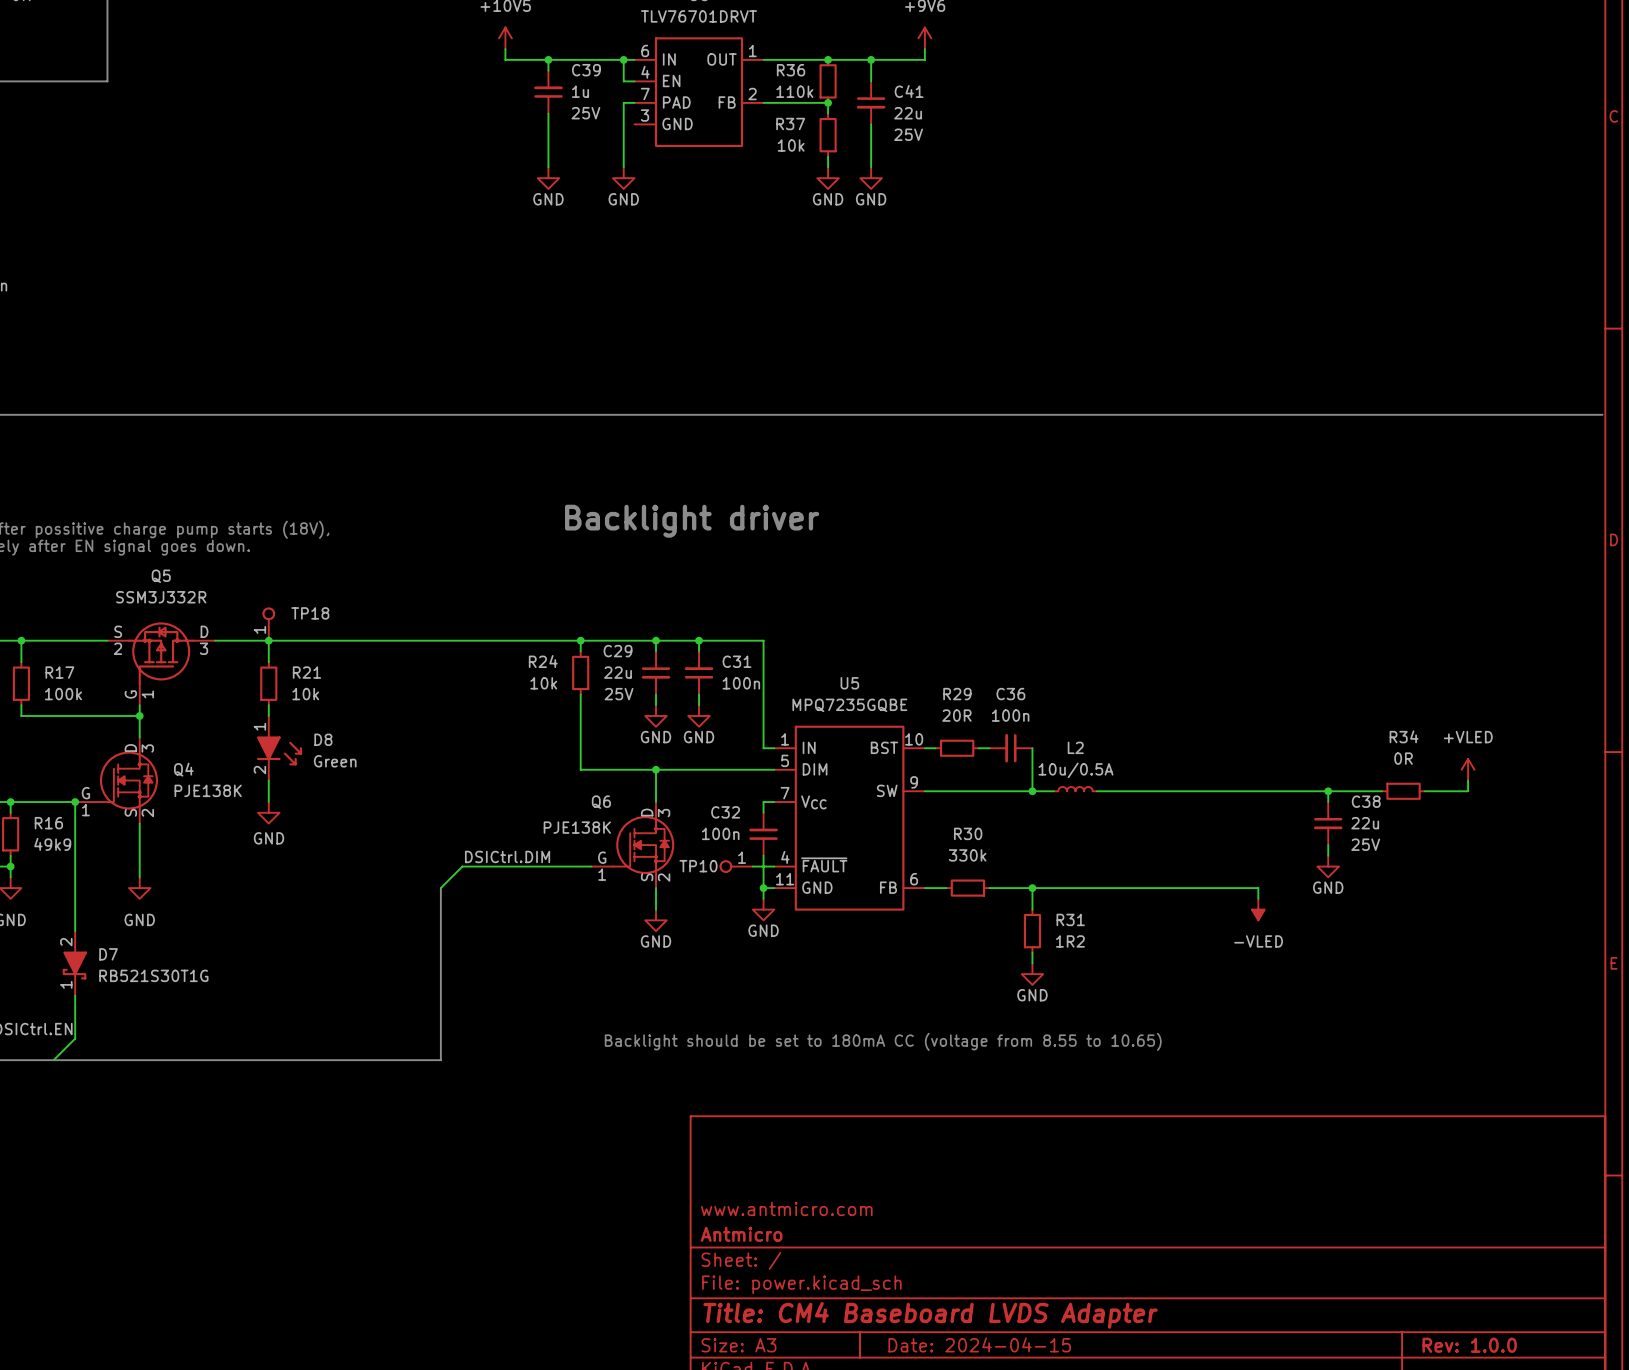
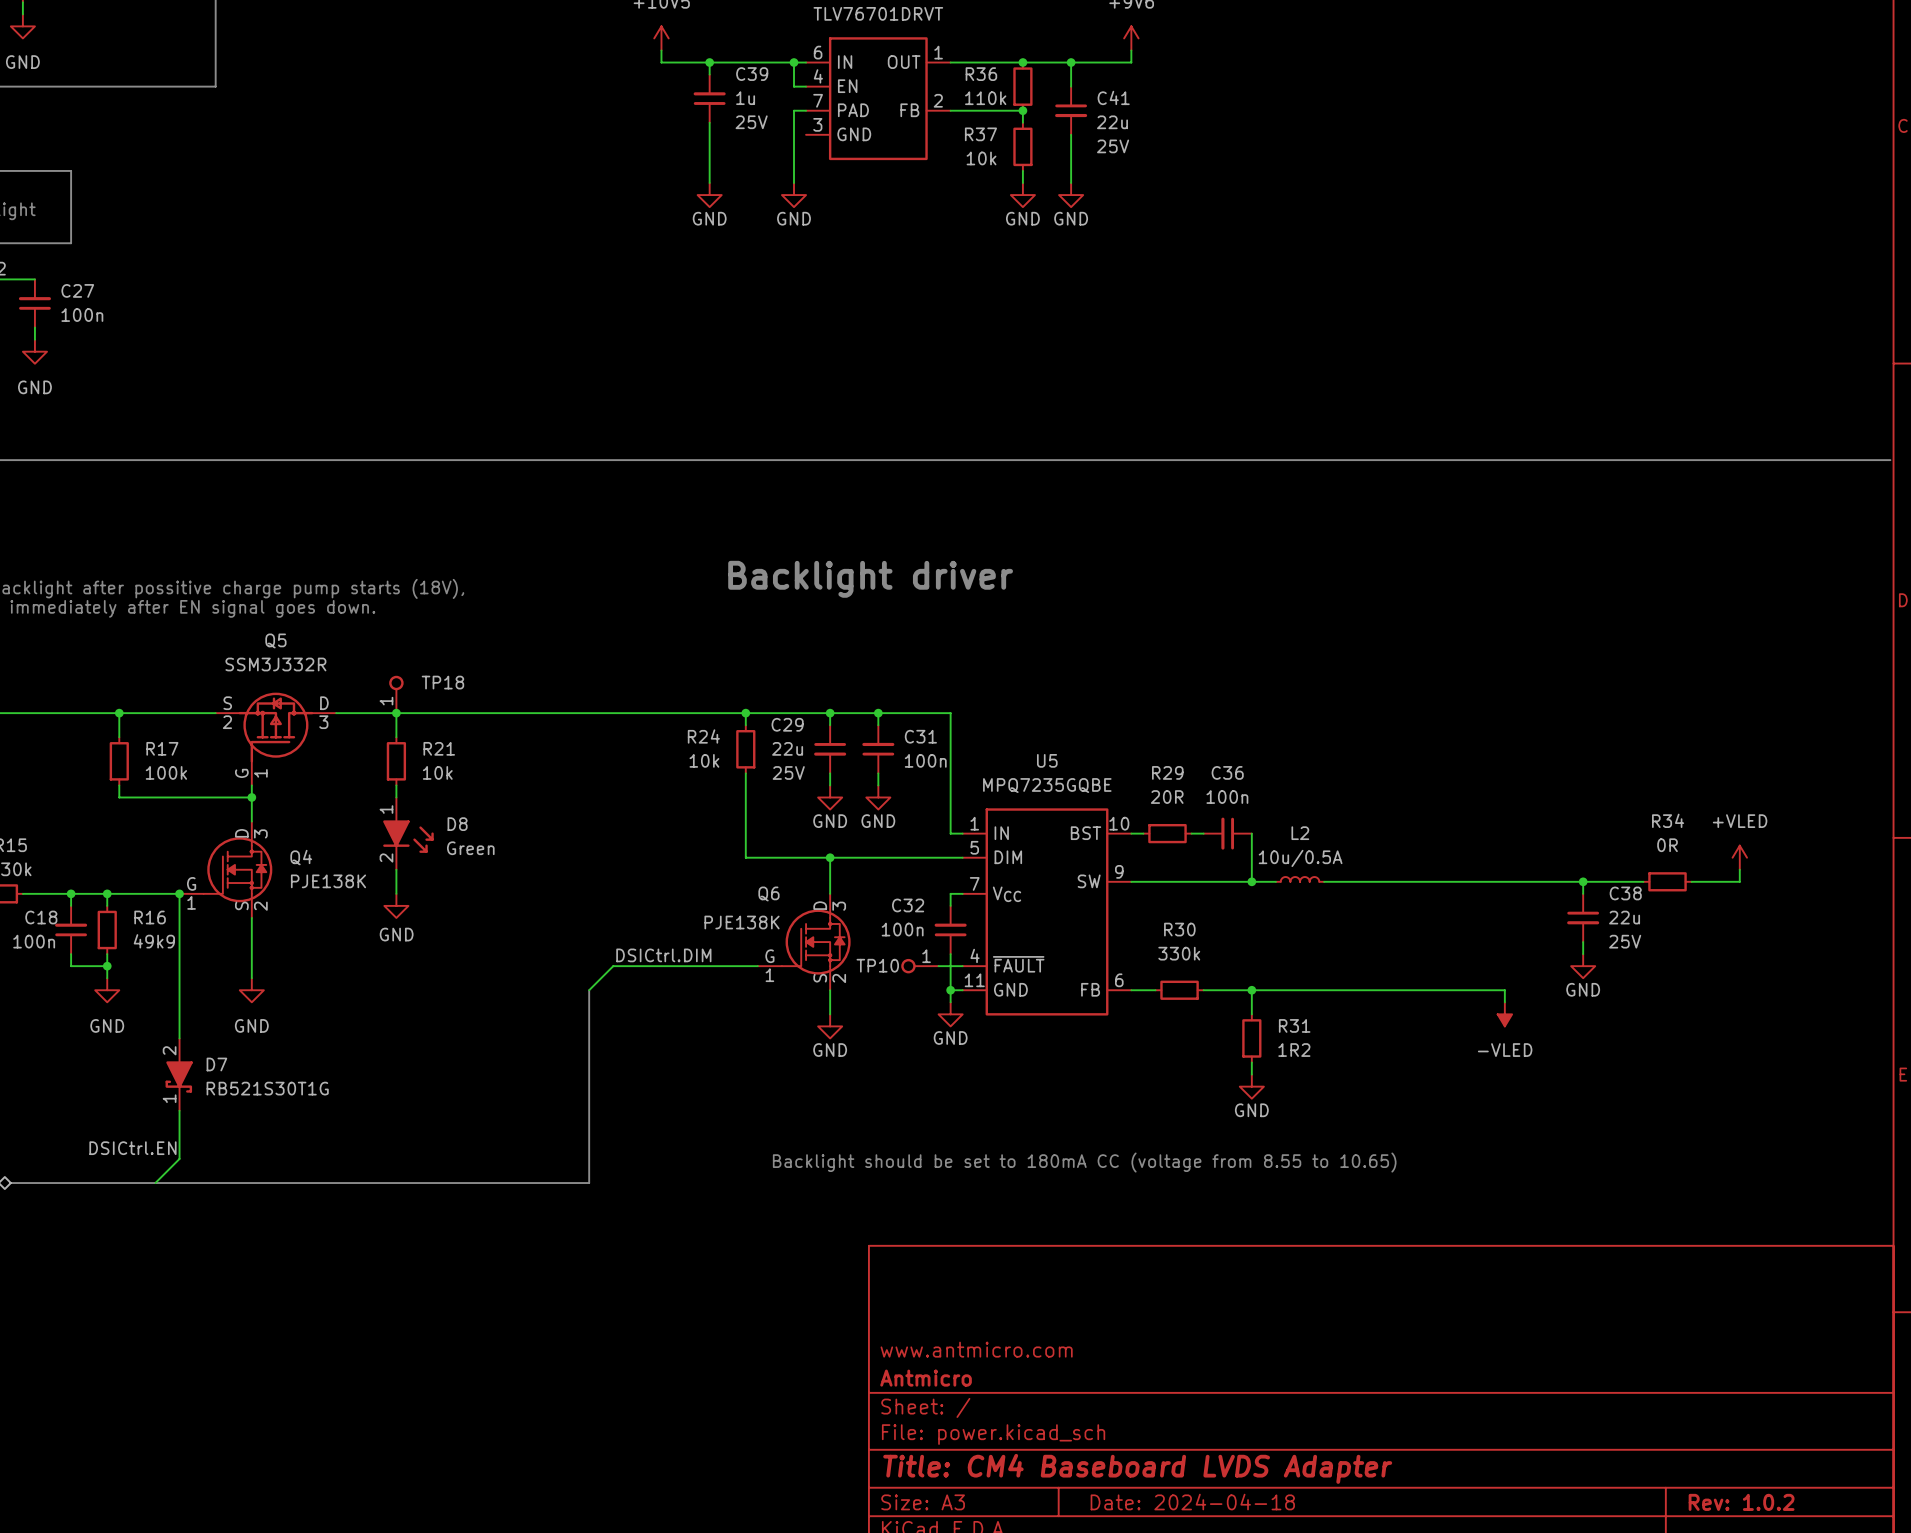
title block: Date: 2024-04-15 (979, 1344) -> Date: 2024-04-18 (1192, 1502)
title block: Rev: 1.0.0 (1469, 1345) -> Rev: 1.0.2 (1741, 1502)

